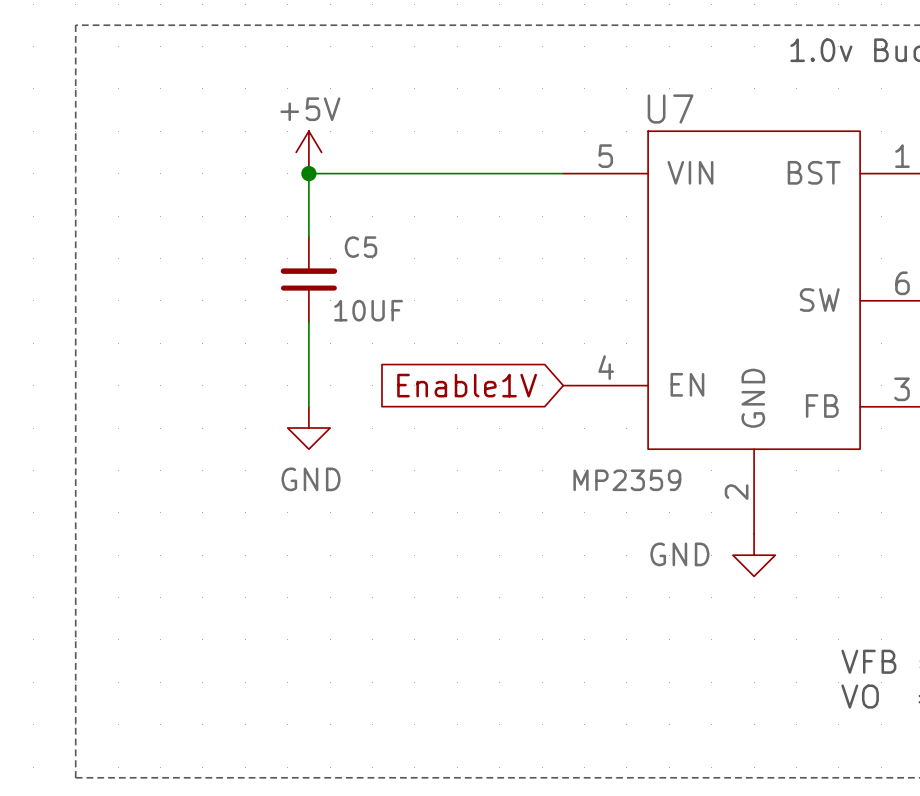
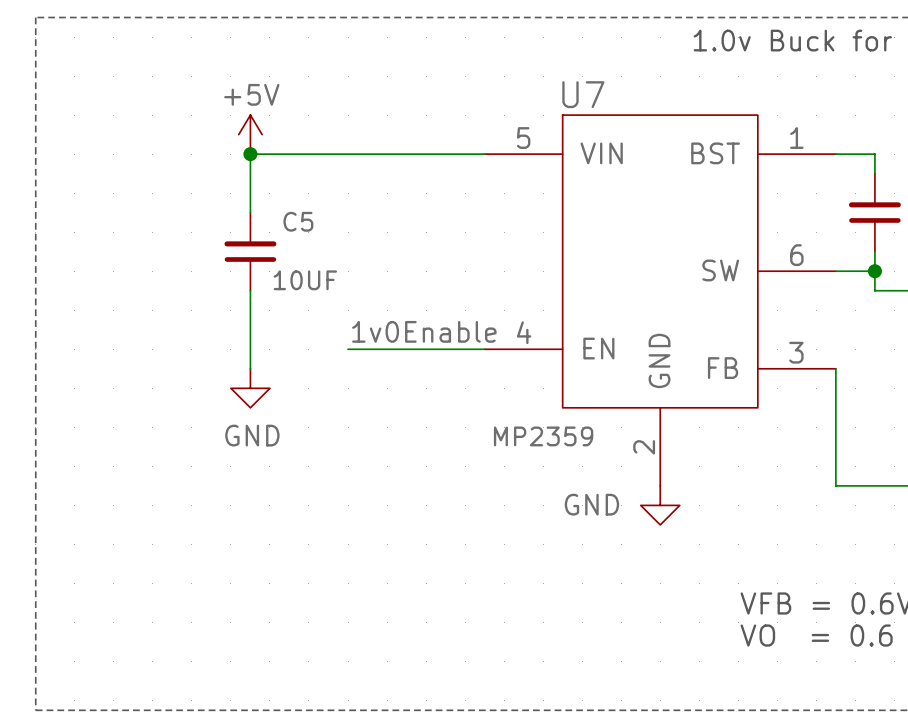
label: none -> 1v0Enable (424, 331)
wire: none -> (348, 349) (484, 349)
global label: Enable1V (467, 385) -> none

